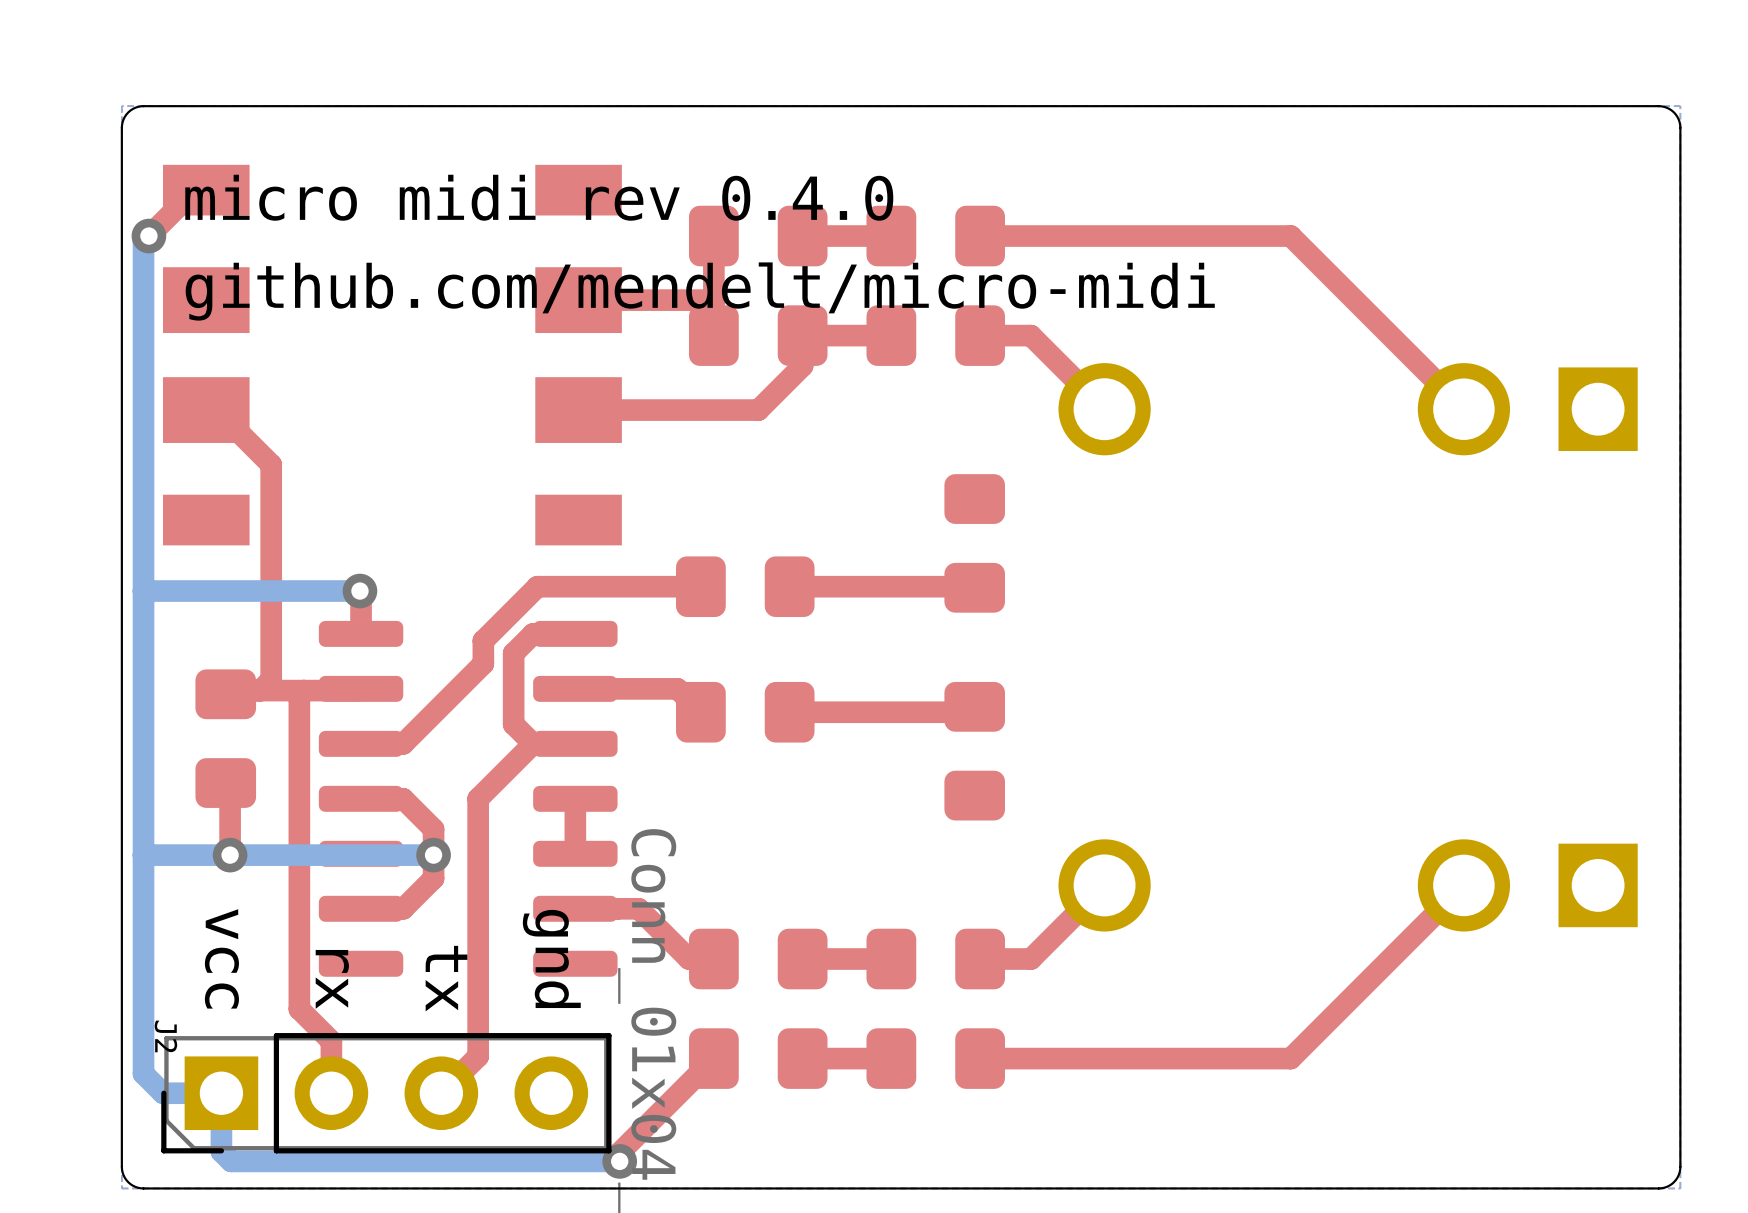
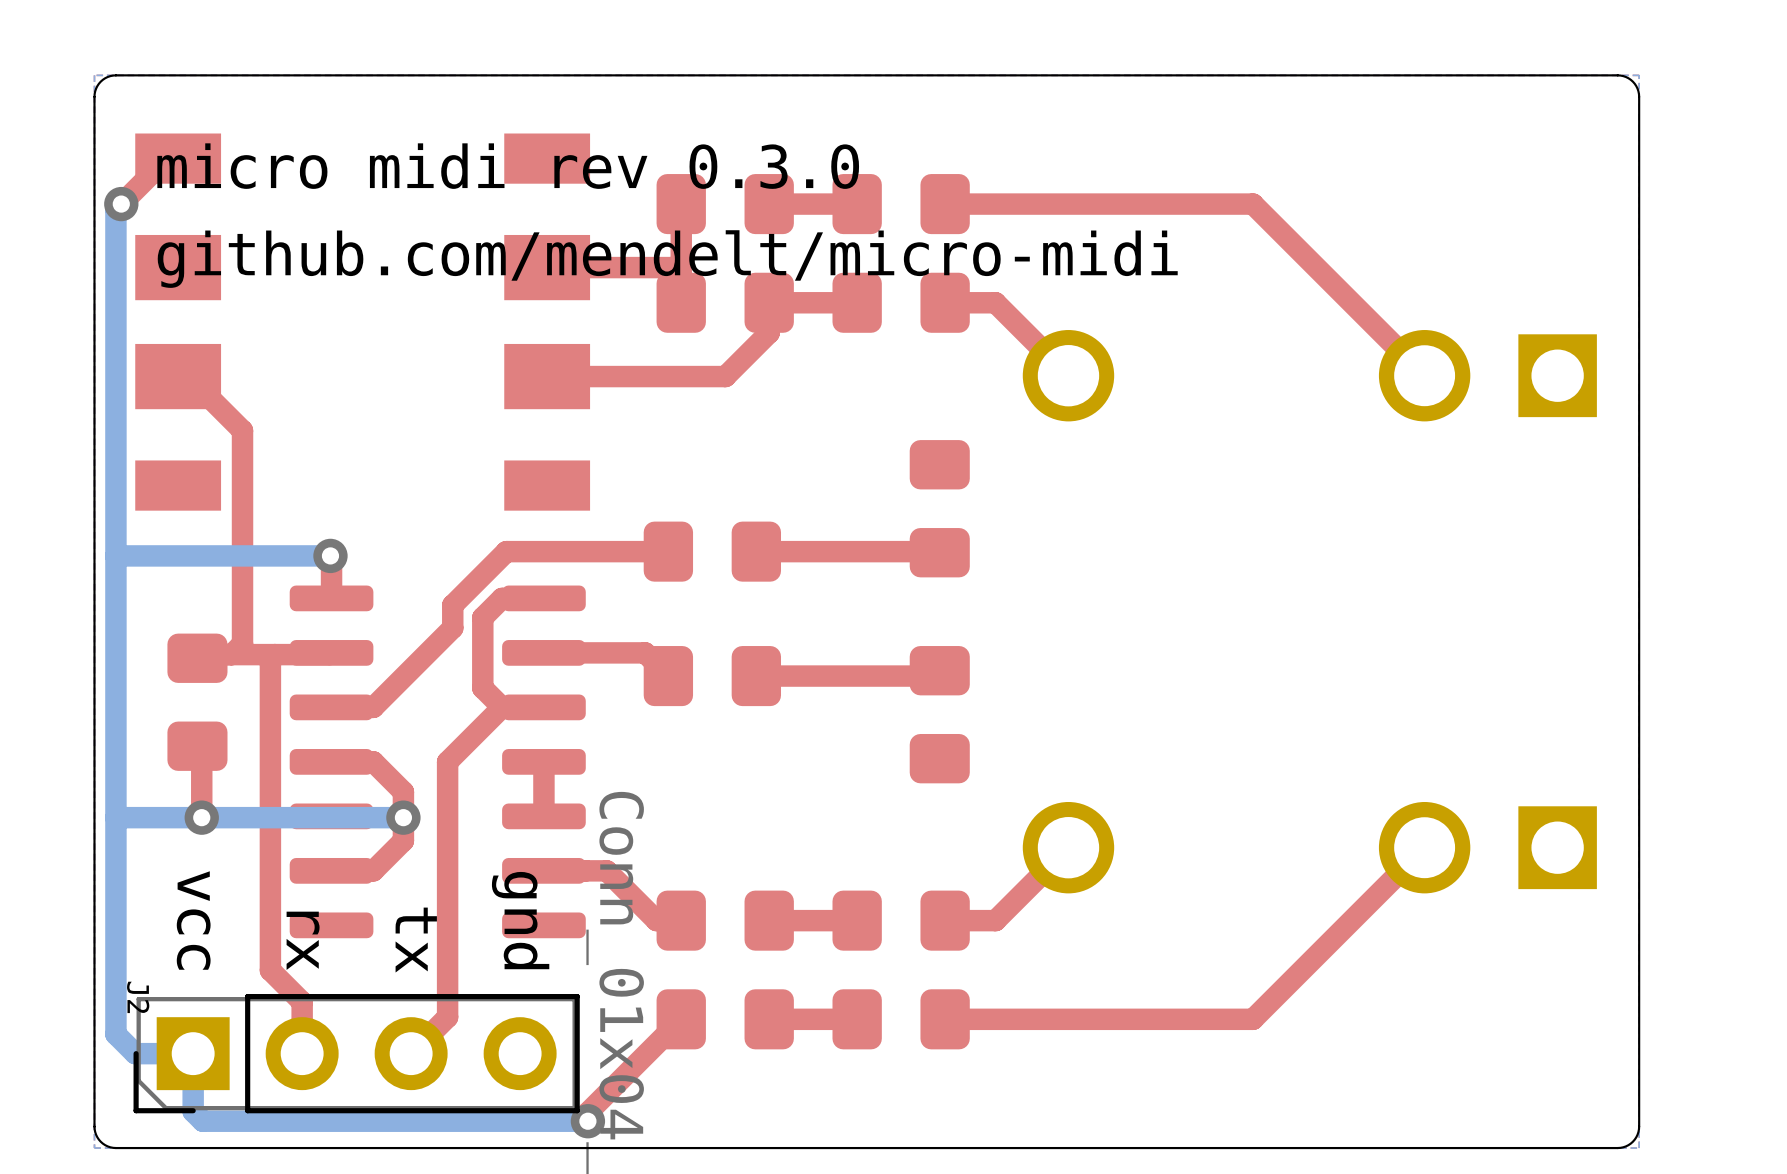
text: micro midi rev 0.4.0 (539, 197) -> micro midi rev 0.3.0 (508, 166)

